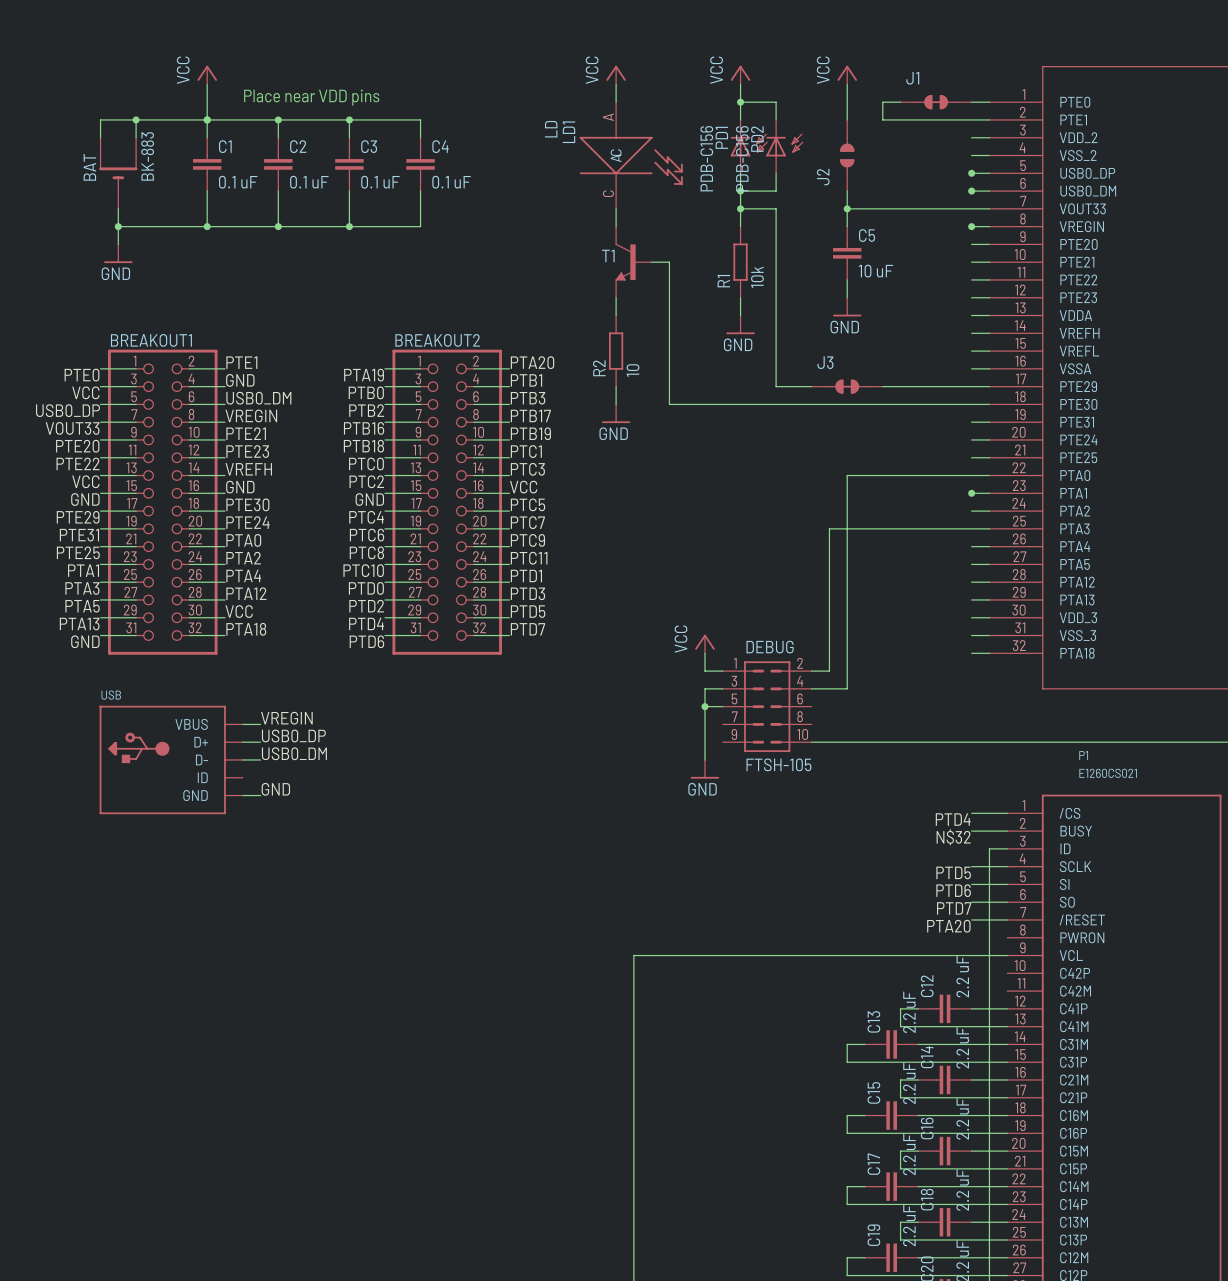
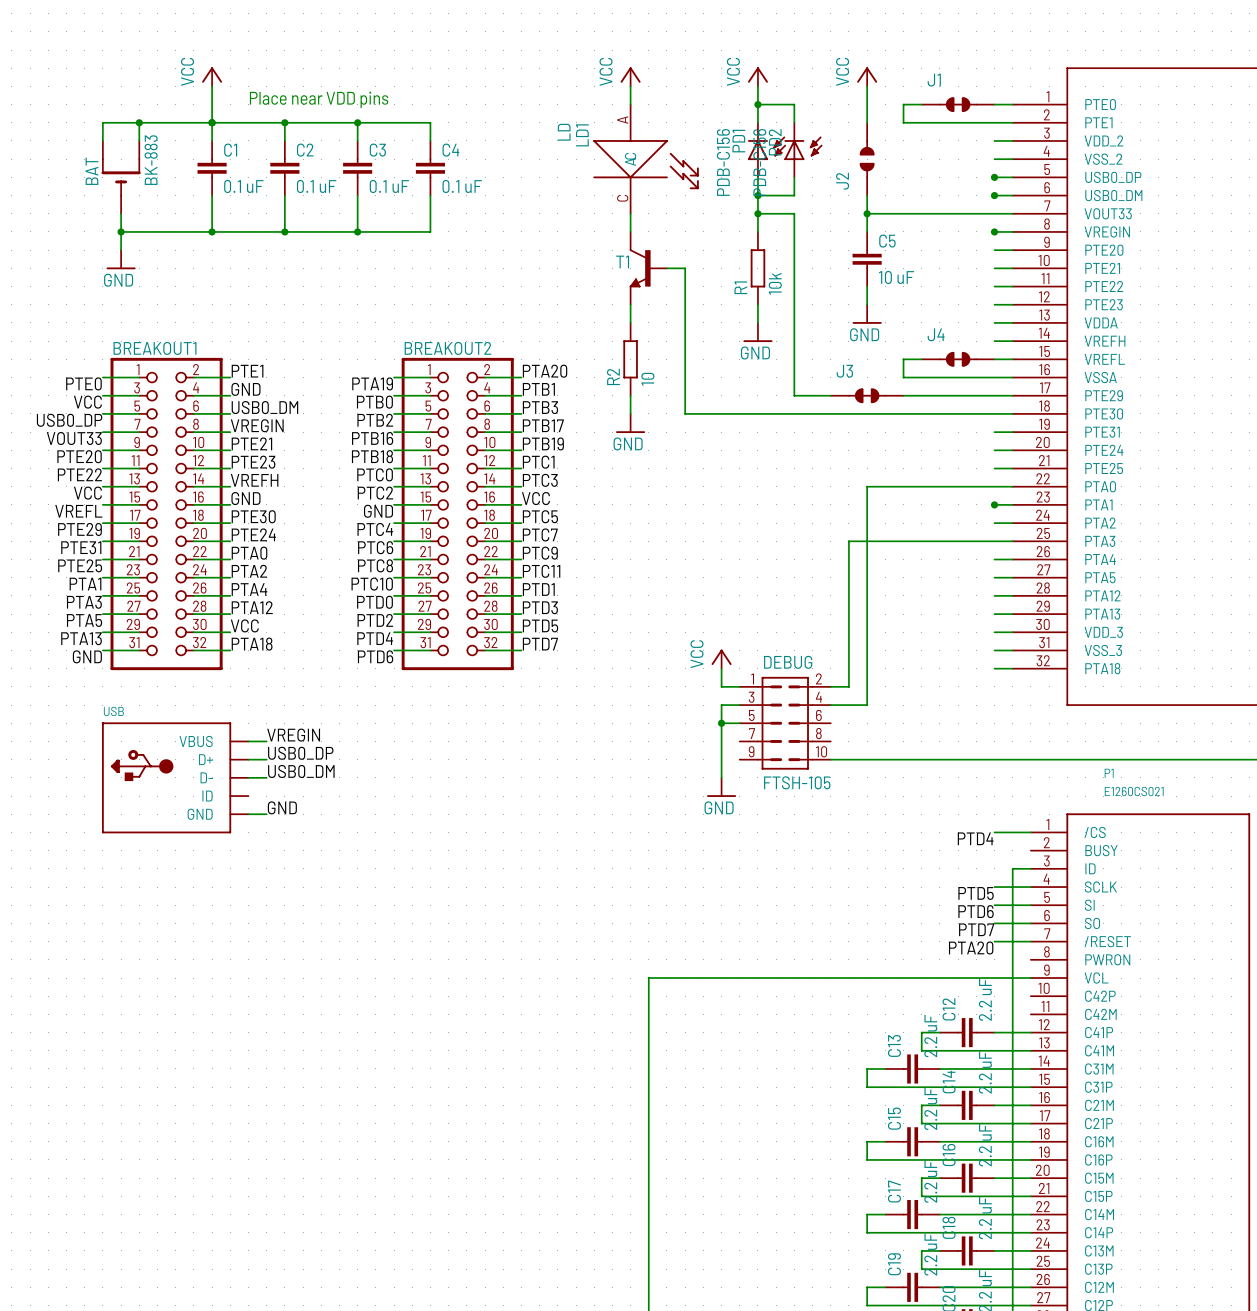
wire: none -> (921, 359) (903, 359) (903, 377) (994, 377)
J4: none -> (958, 359)
label: GND (85, 499) -> VREFL (78, 511)
wire: (971, 831) (1007, 831) -> none
label: N$32 (953, 837) -> none

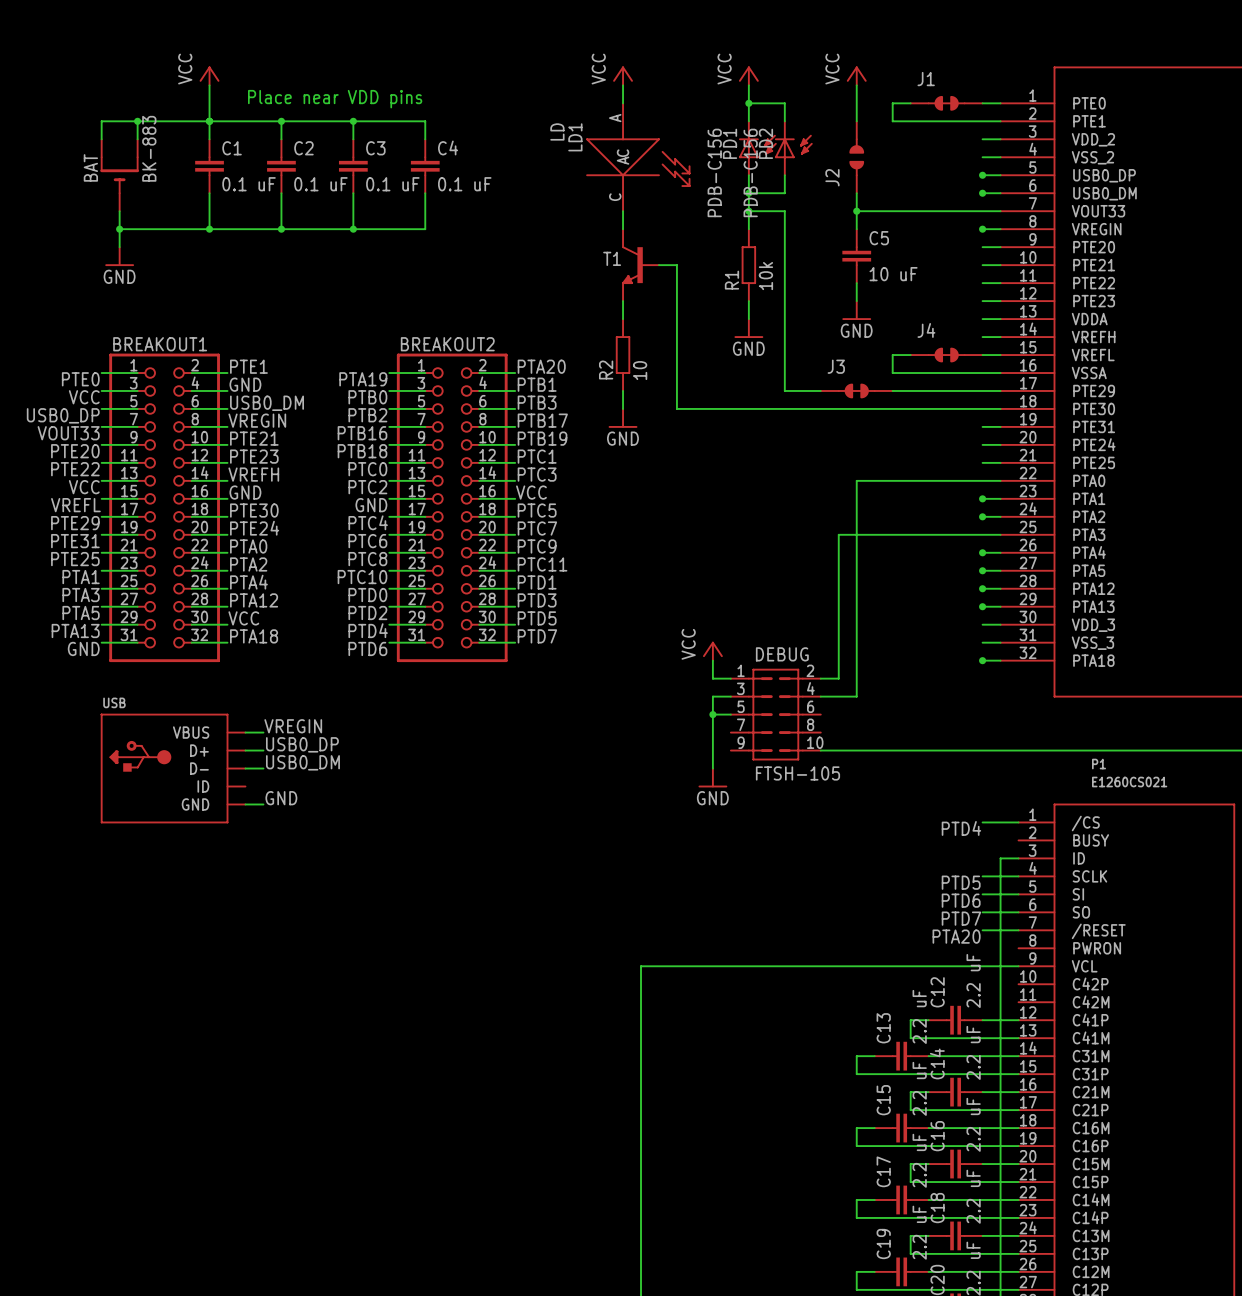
junction: none -> (982, 516)
junction: none -> (982, 552)
junction: none -> (982, 570)
junction: none -> (982, 588)
junction: none -> (982, 606)
junction: none -> (982, 660)

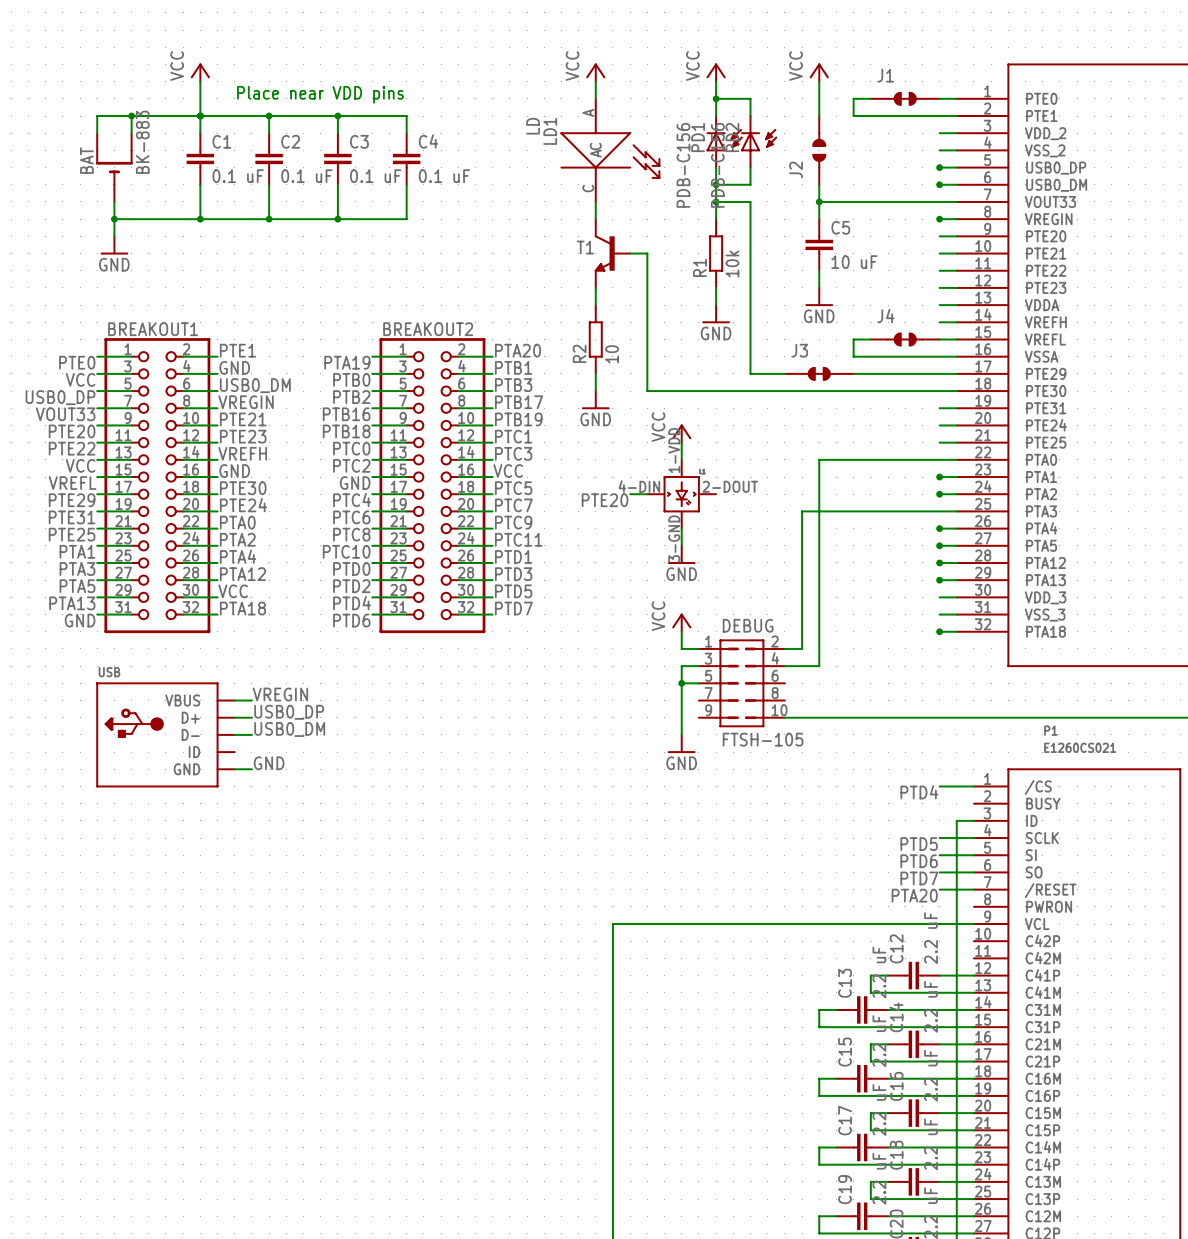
power symbol: none -> VCC (681, 433)
wire: none -> (681, 442) (681, 459)
wire: none -> (630, 494) (647, 494)
part: none -> (681, 494)
label: none -> PTE20 (605, 500)
wire: none -> (681, 528) (681, 545)
power symbol: none -> GND (681, 554)

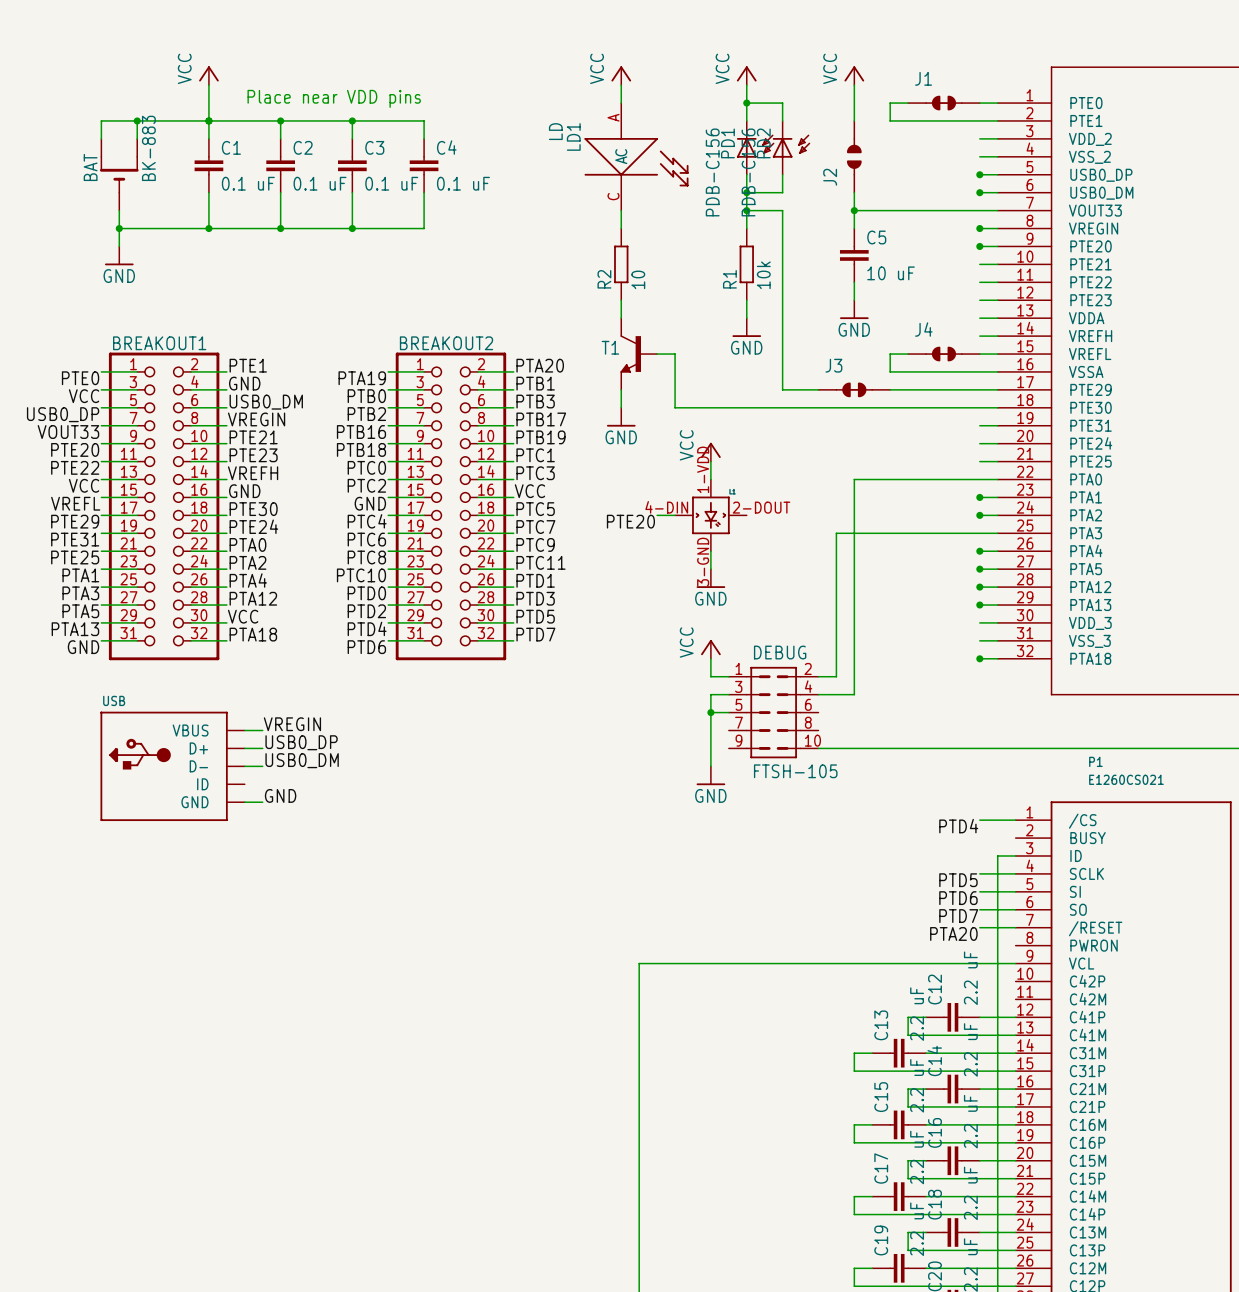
junction: none -> (979, 246)
T1 position: (612, 253) -> (638, 354)
wire: (630, 253) (647, 253) (647, 339) -> (657, 354) (675, 354)
R2 position: (595, 339) -> (621, 264)

